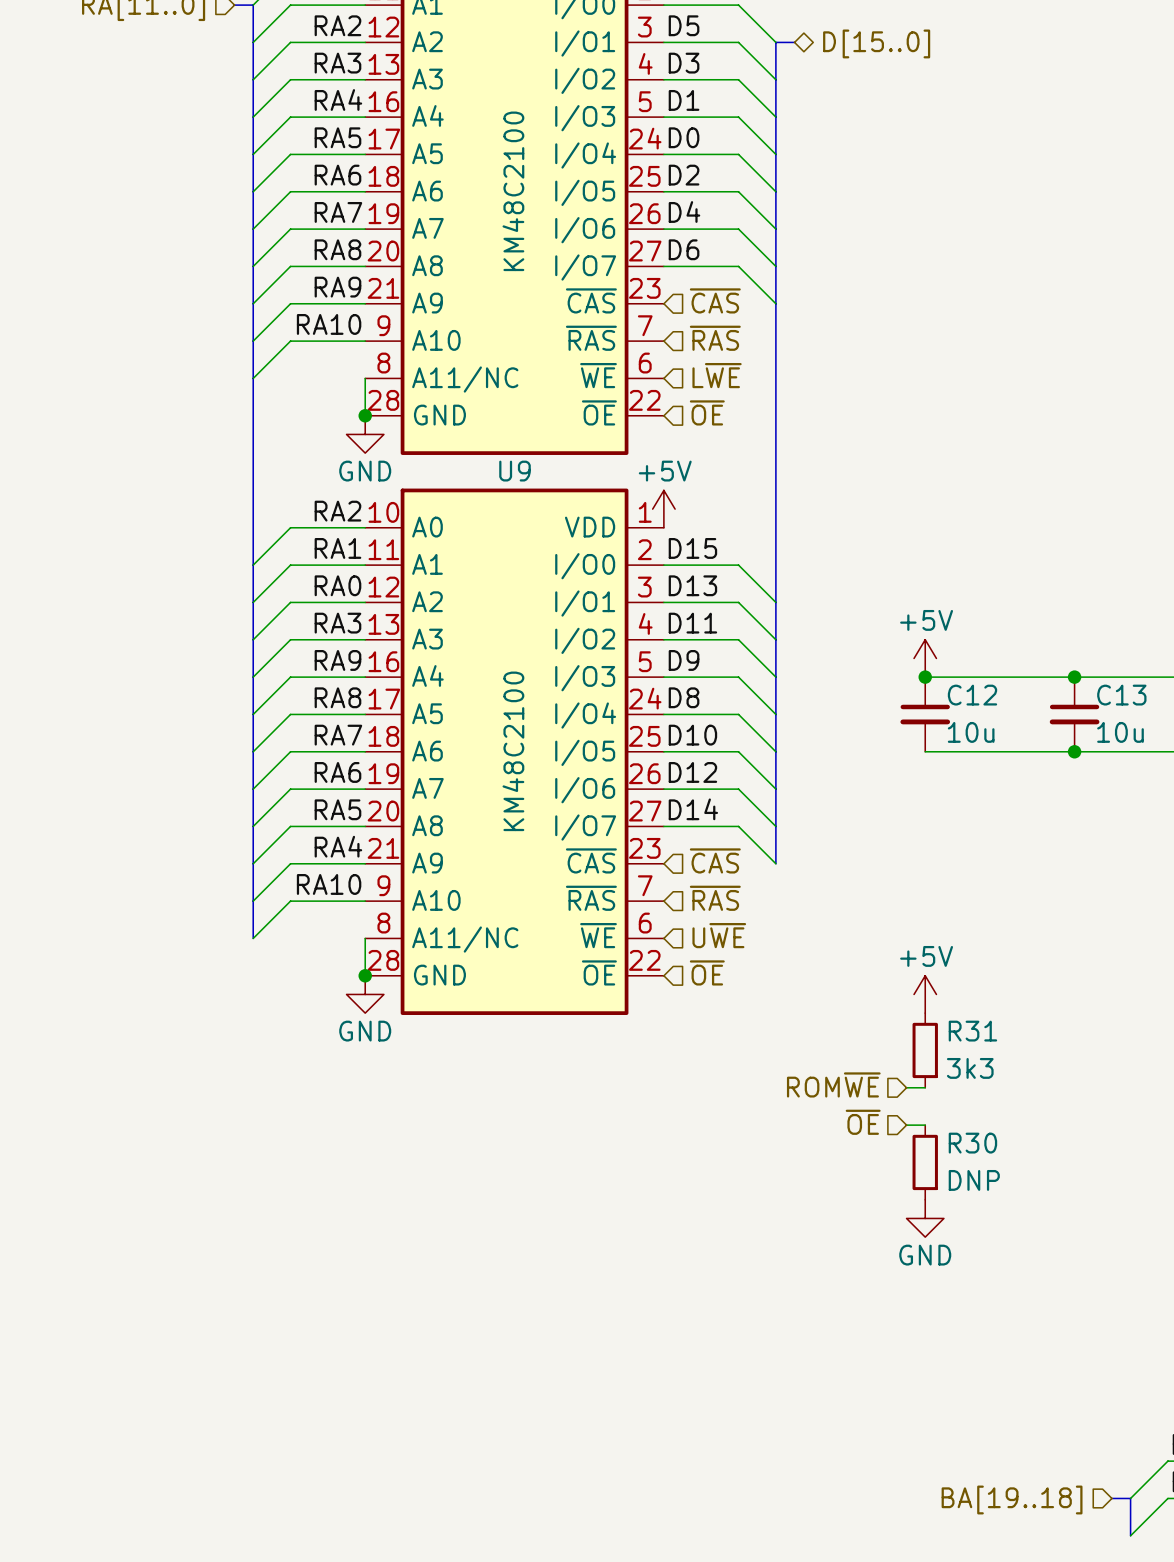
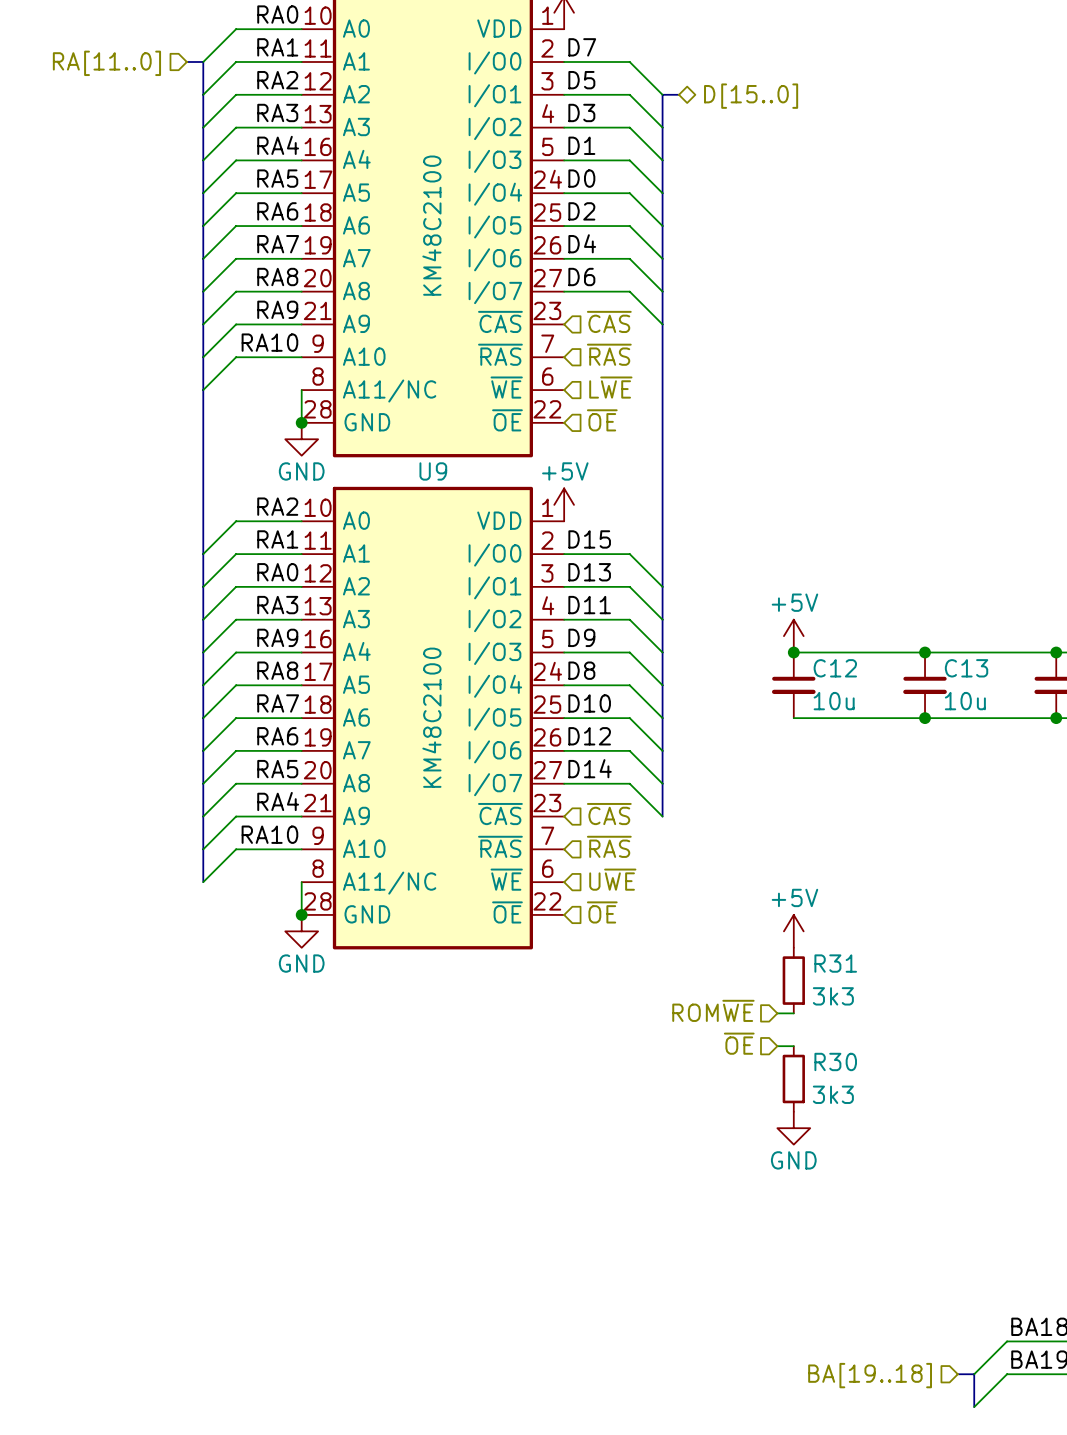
R30 value: DNP (974, 1180) -> 3k3 (833, 1094)

